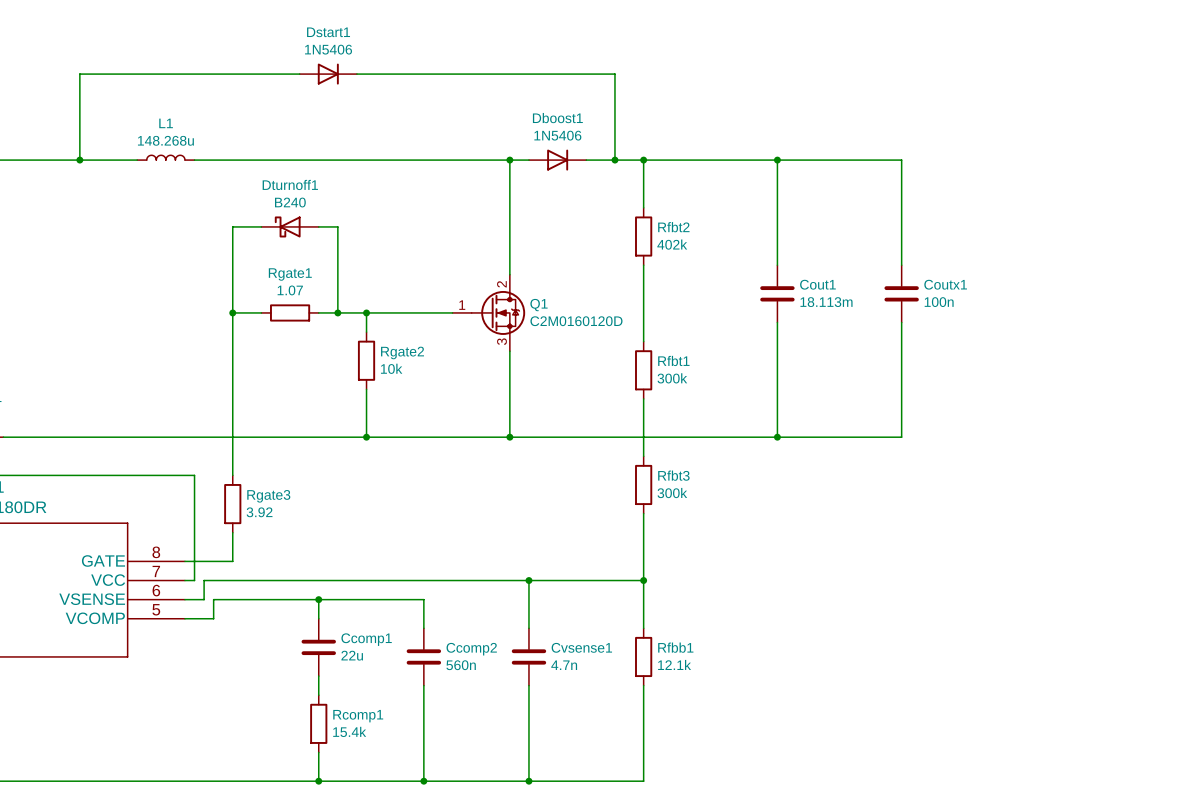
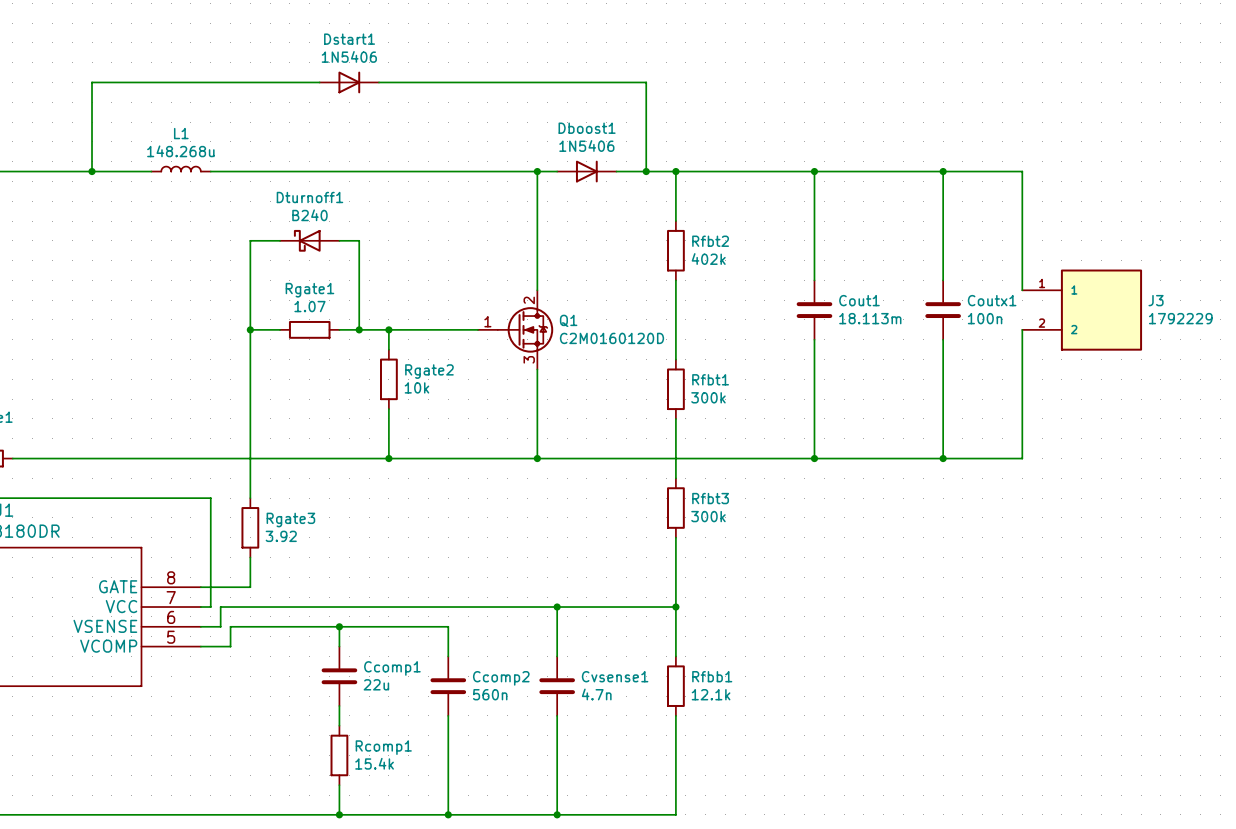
wire: none -> (943, 171) (1022, 171) (1022, 290)
junction: none -> (943, 171)
J3: none -> 1792229 (1082, 310)
wire: none -> (1022, 329) (1022, 458) (943, 458)
junction: none -> (943, 458)

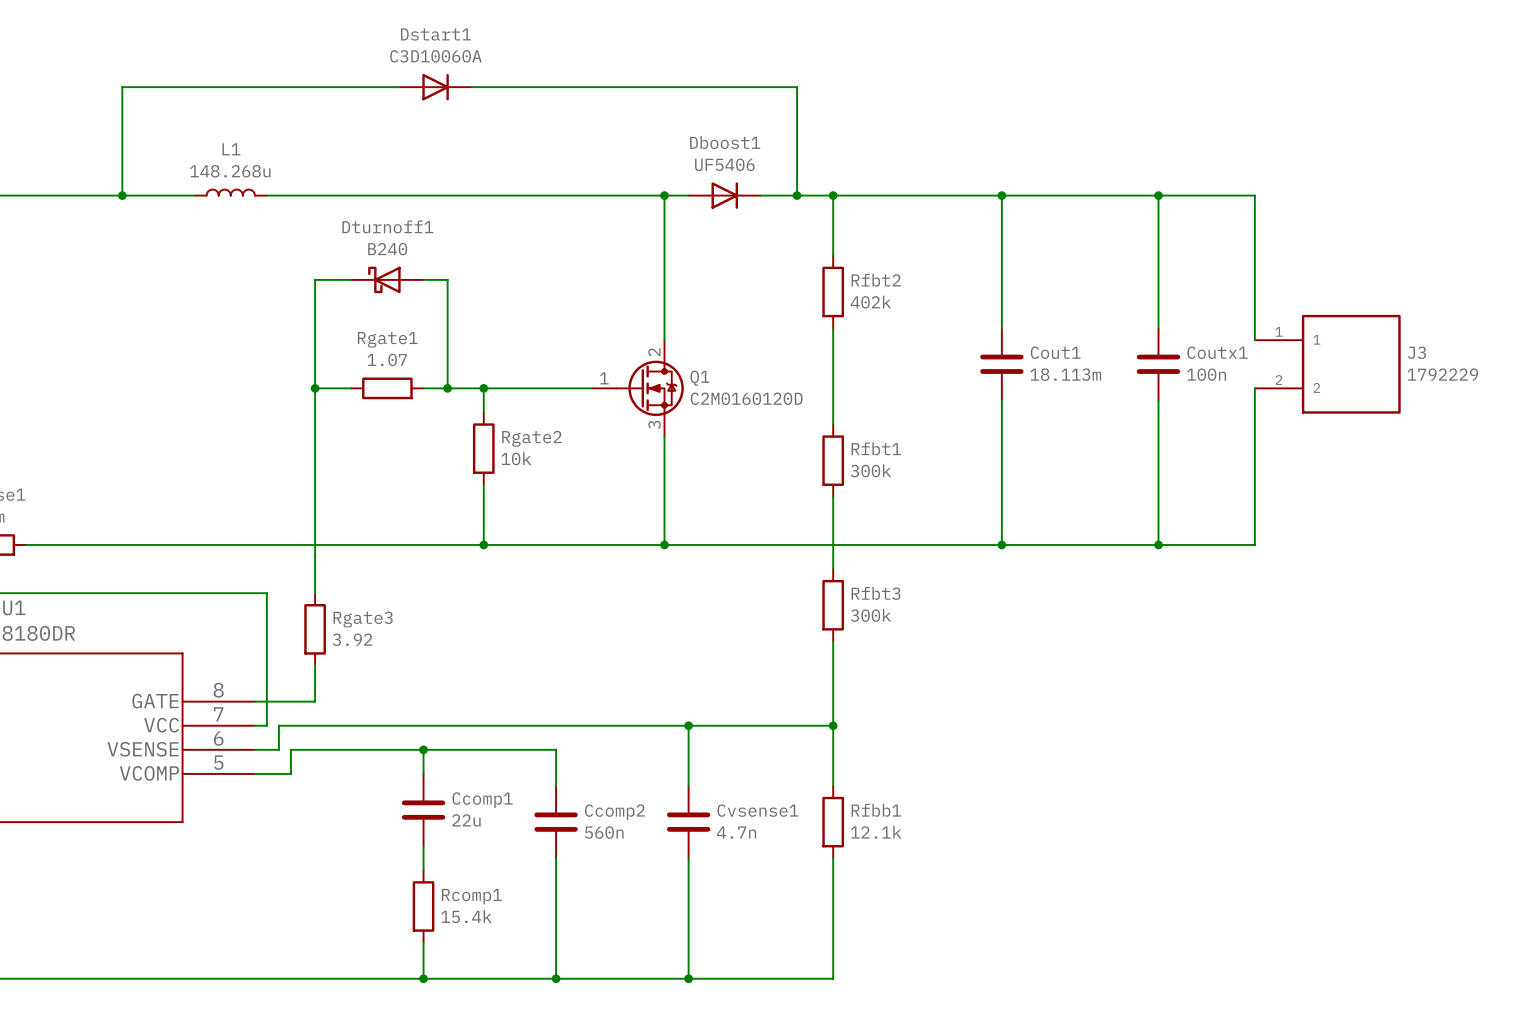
Dstart1 value: 1N5406 (349, 56) -> C3D10060A (435, 56)
Dboost1 value: 1N5406 (586, 145) -> UF5406 (724, 164)

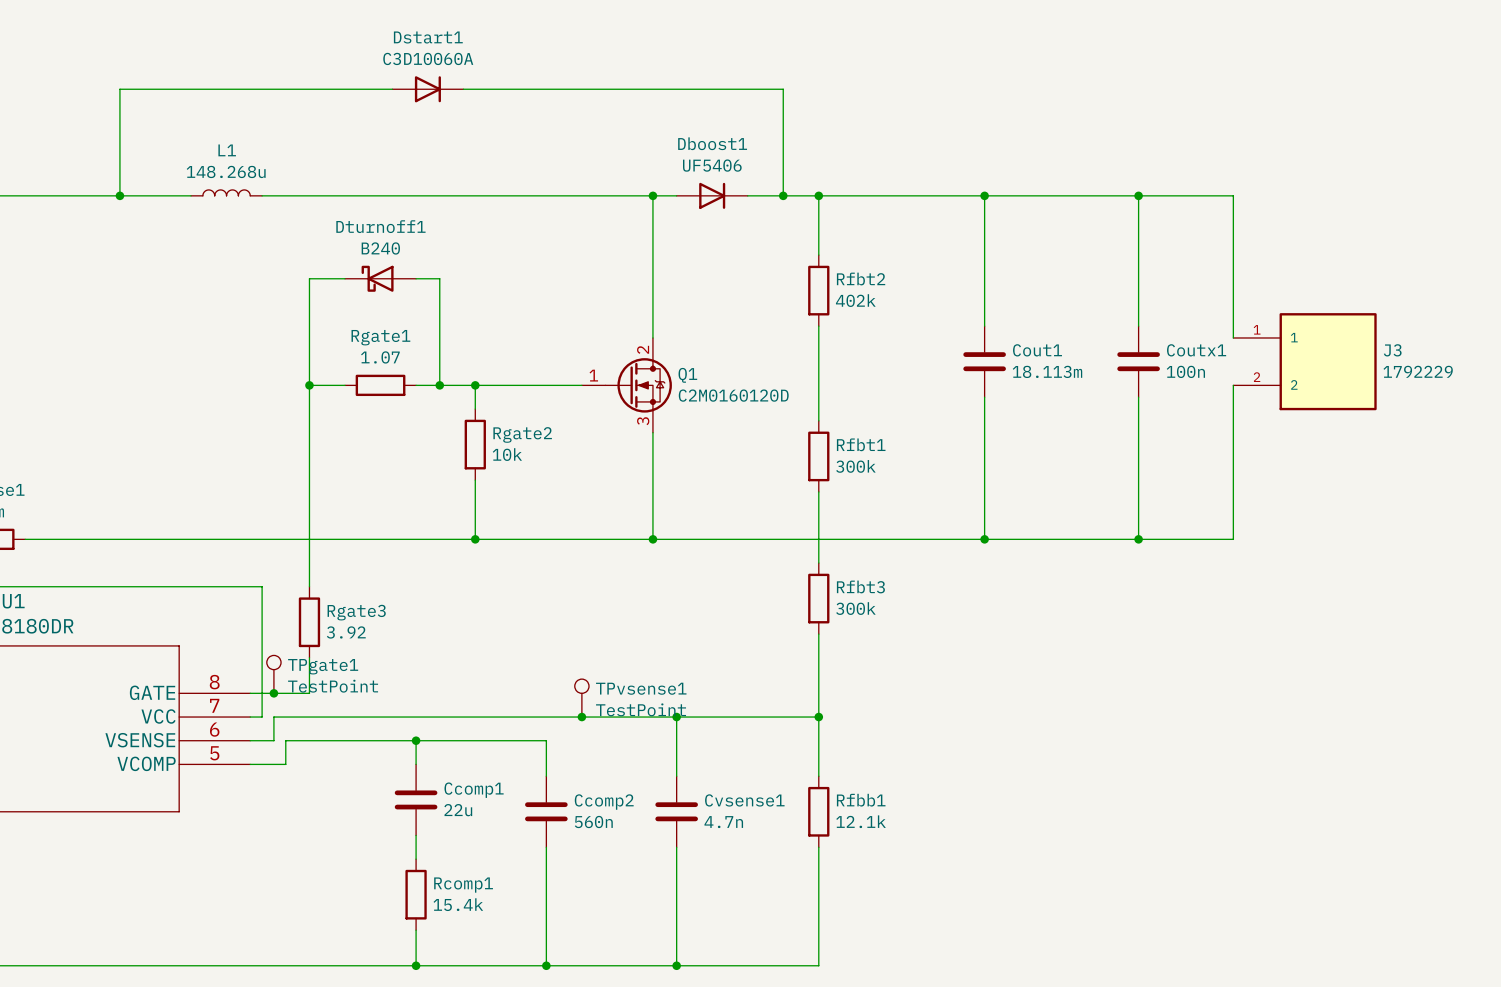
TPgate1: none -> TestPoint (273, 674)
junction: none -> (273, 693)
TPvsense1: none -> TestPoint (581, 698)
junction: none -> (581, 717)

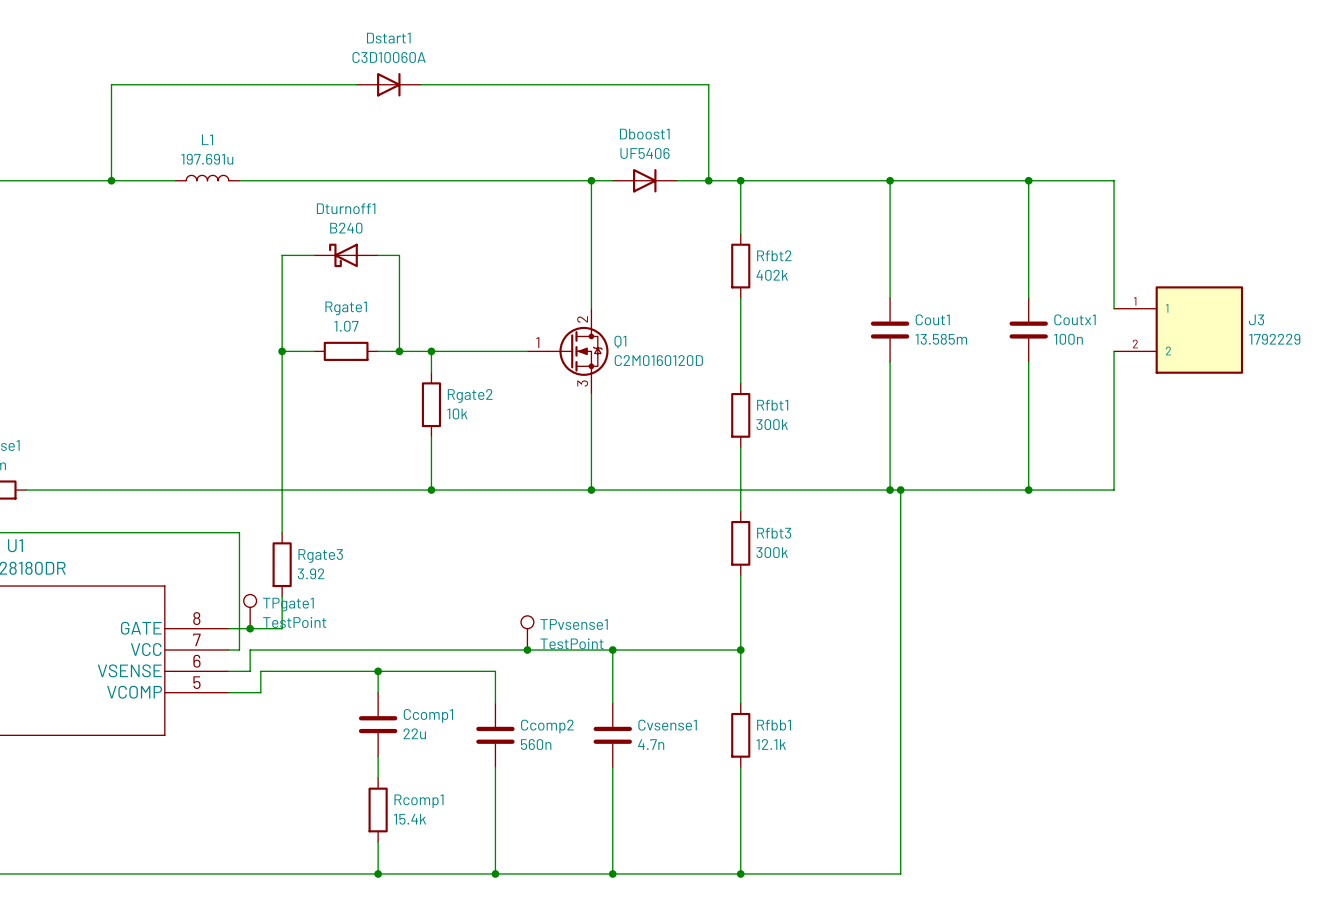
L1 value: 148.268u (226, 171) -> 197.691u (207, 159)
Cout1 value: 18.113m (1047, 371) -> 13.585m (941, 339)
wire: none -> (900, 490) (900, 873) (740, 873)
junction: none -> (900, 490)
junction: none -> (740, 873)

